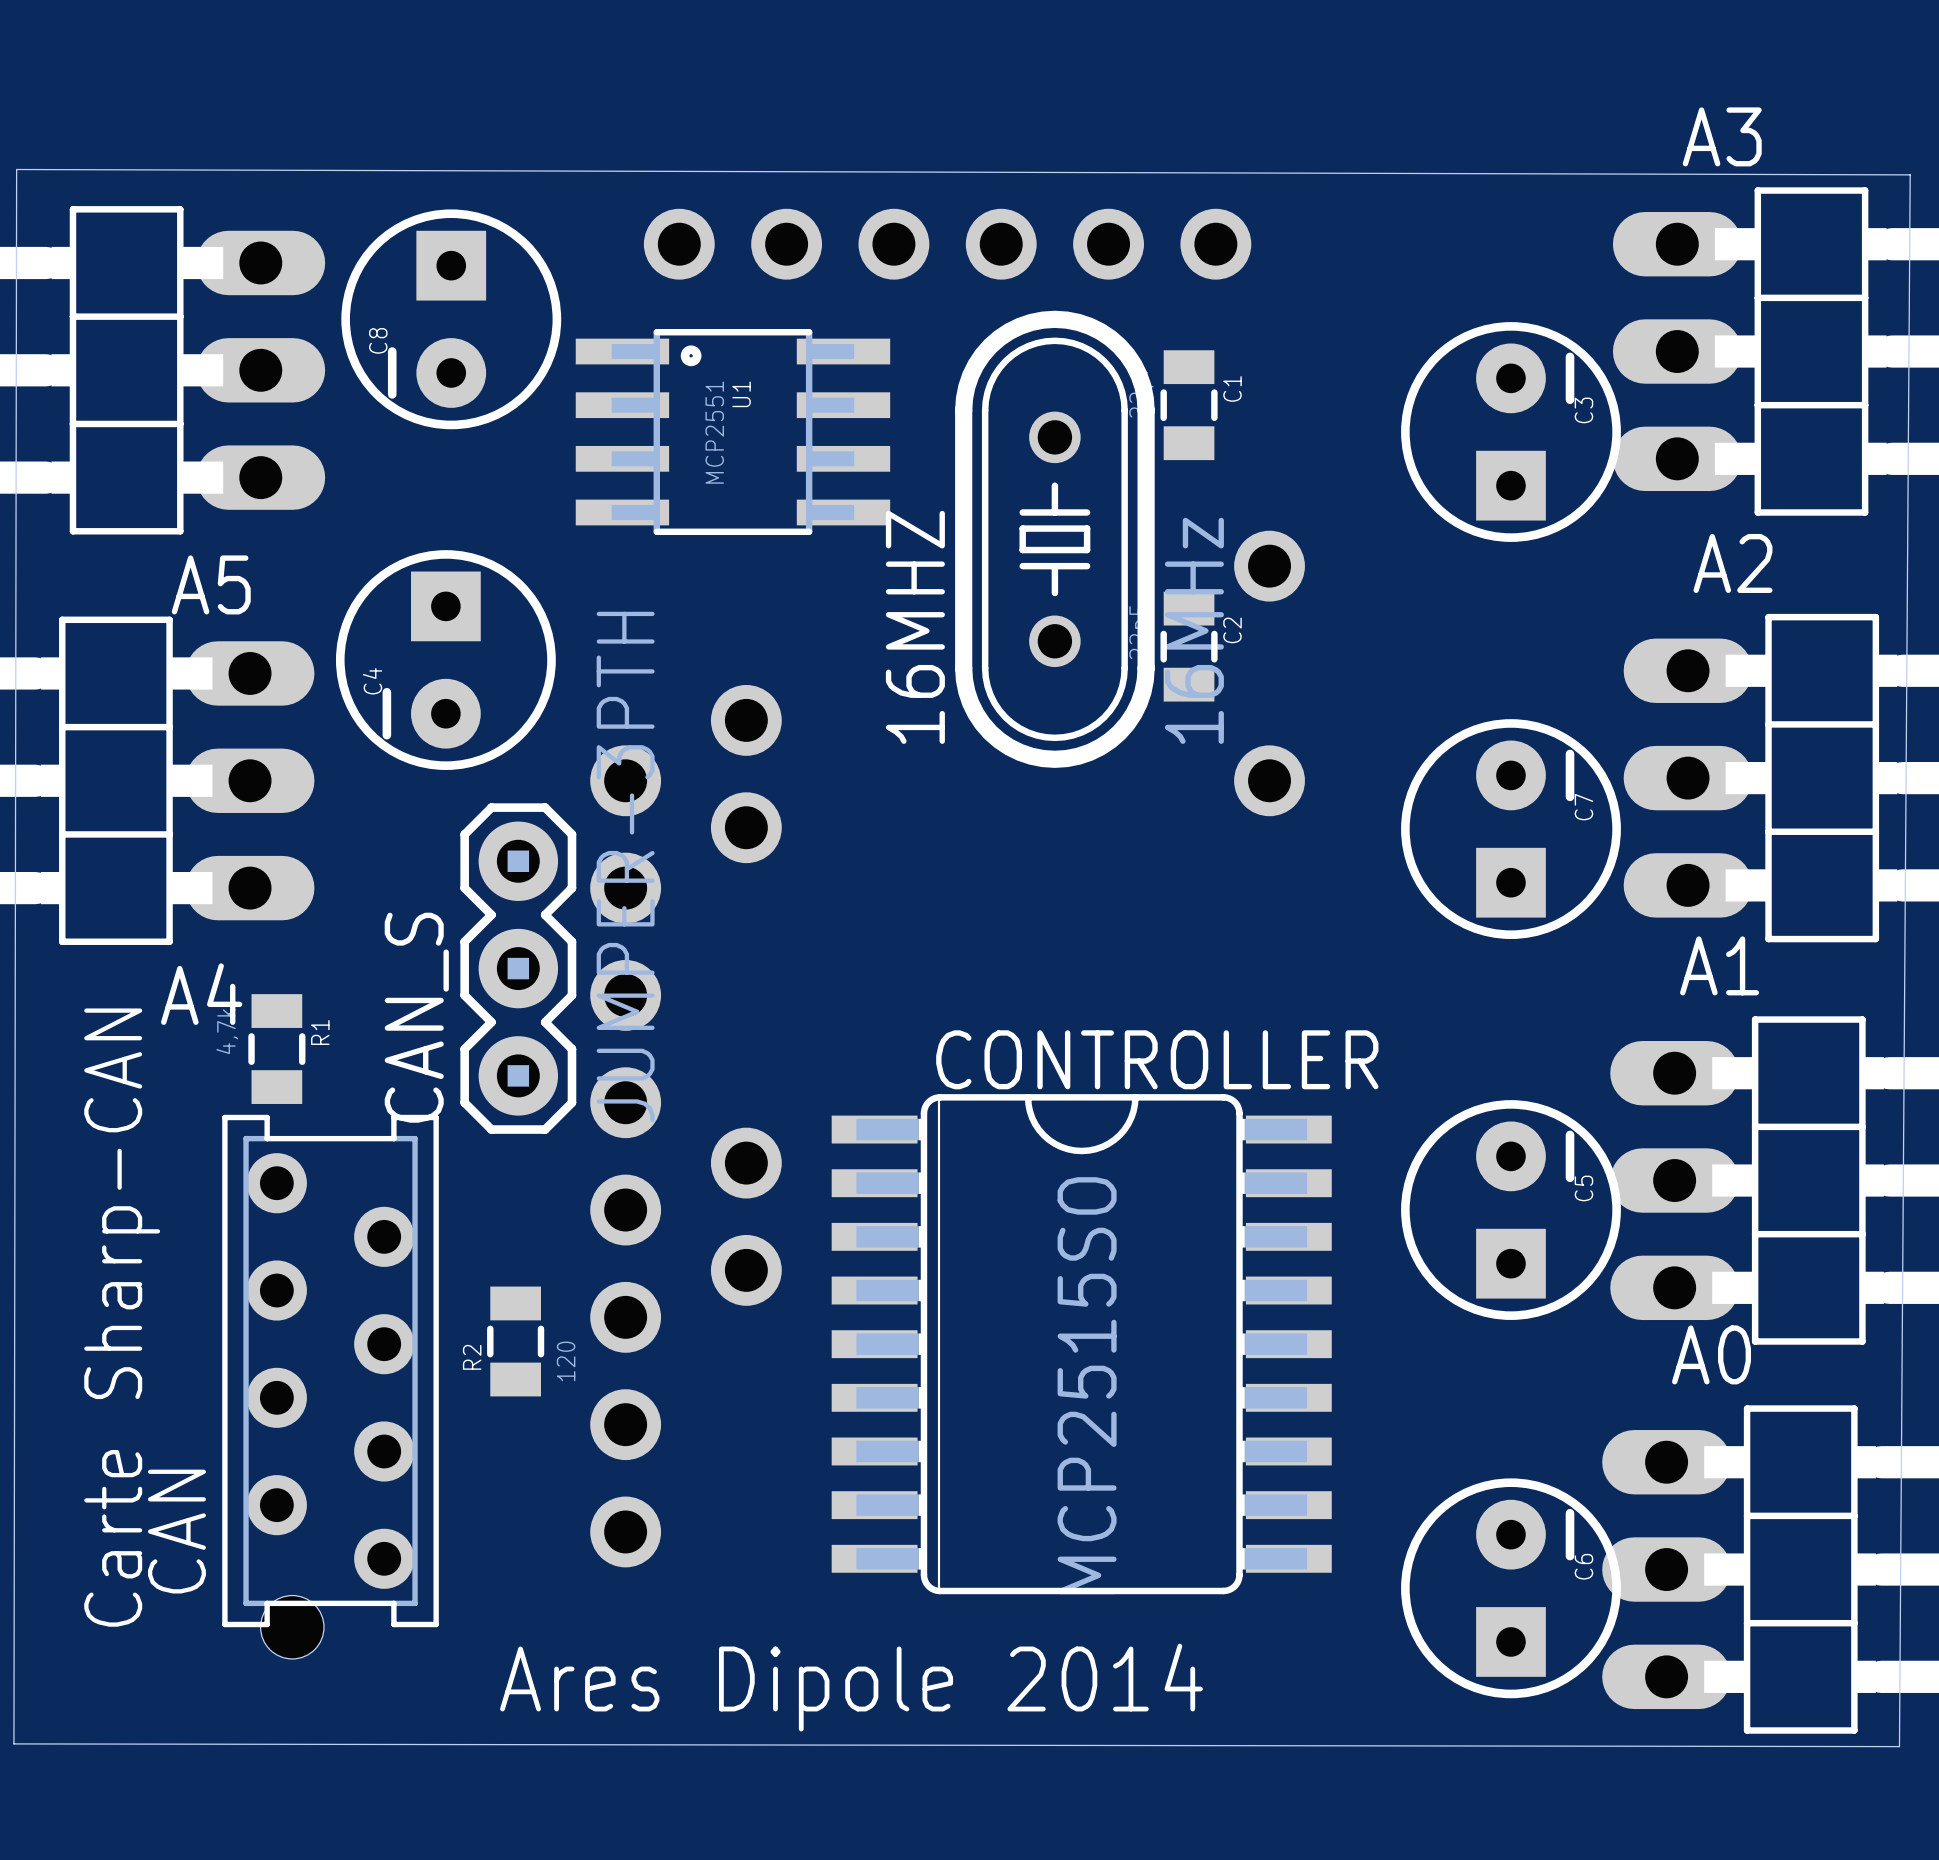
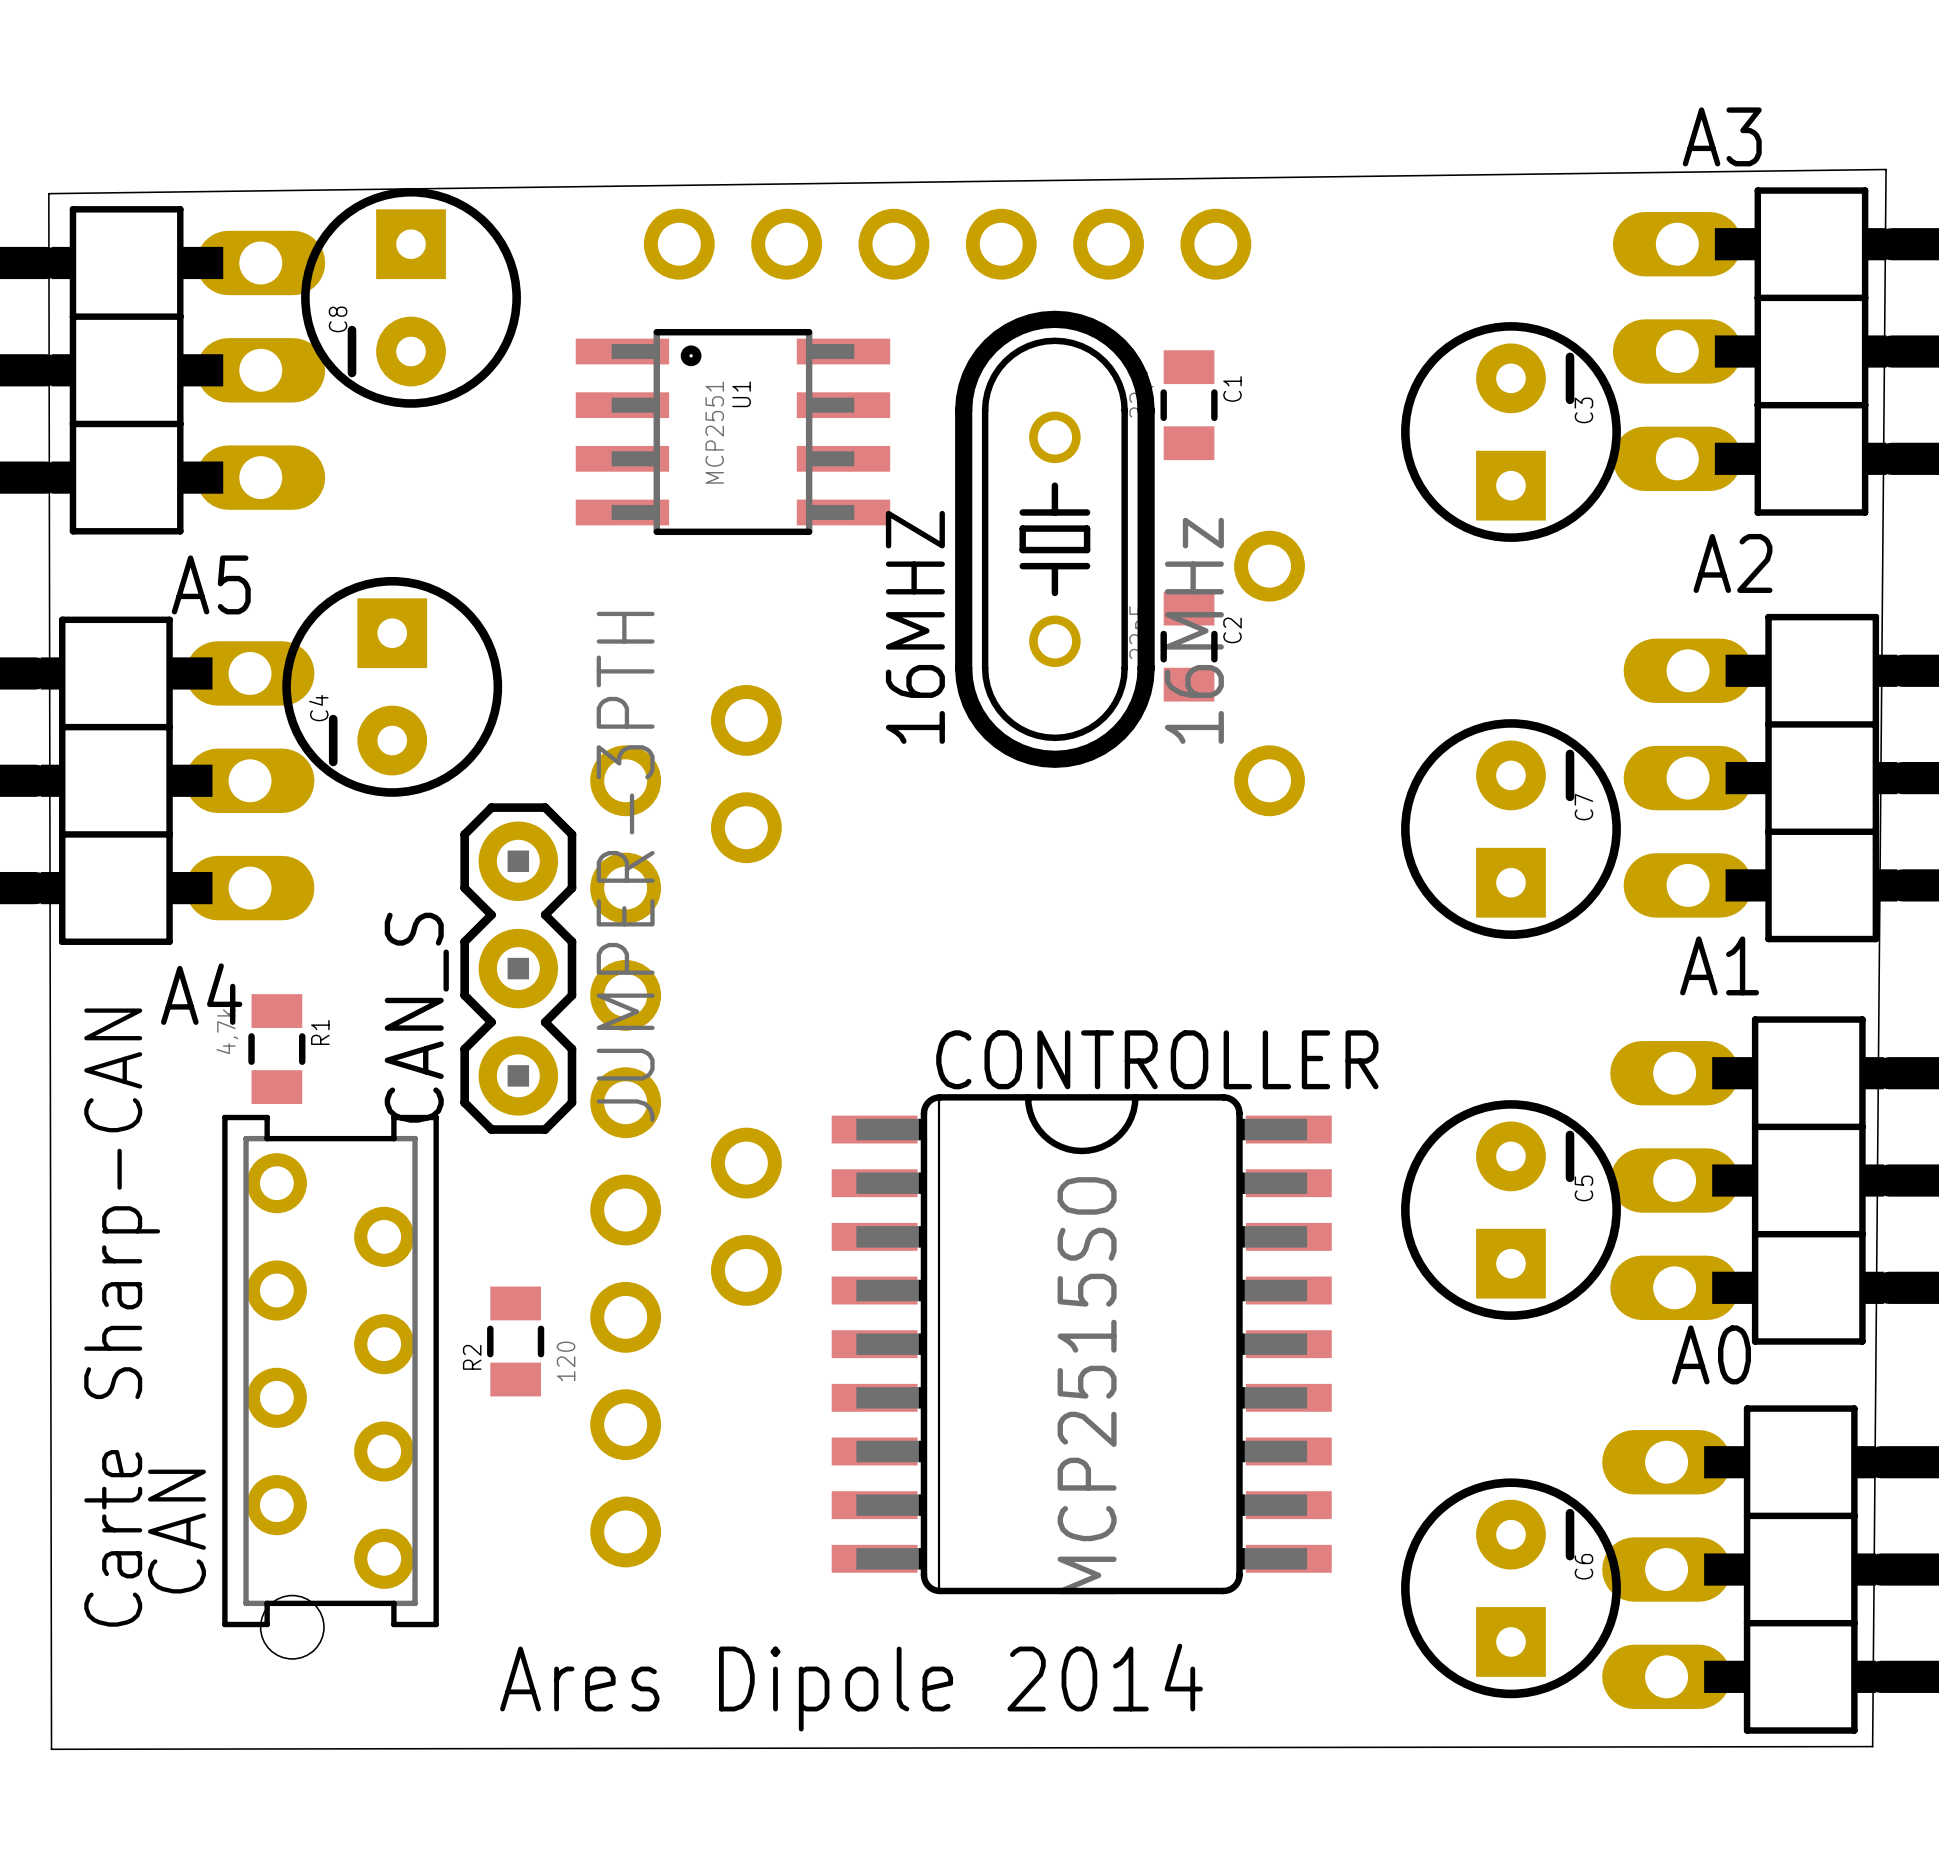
board edge: (16, 169) (1910, 174) (1899, 1746) (13, 1743) (16, 169) -> (1886, 169) (48, 193) (51, 1749) (1872, 1746) (1886, 169)
C8 position: (451, 319) -> (411, 297)
C4 position: (445, 660) -> (392, 686)

